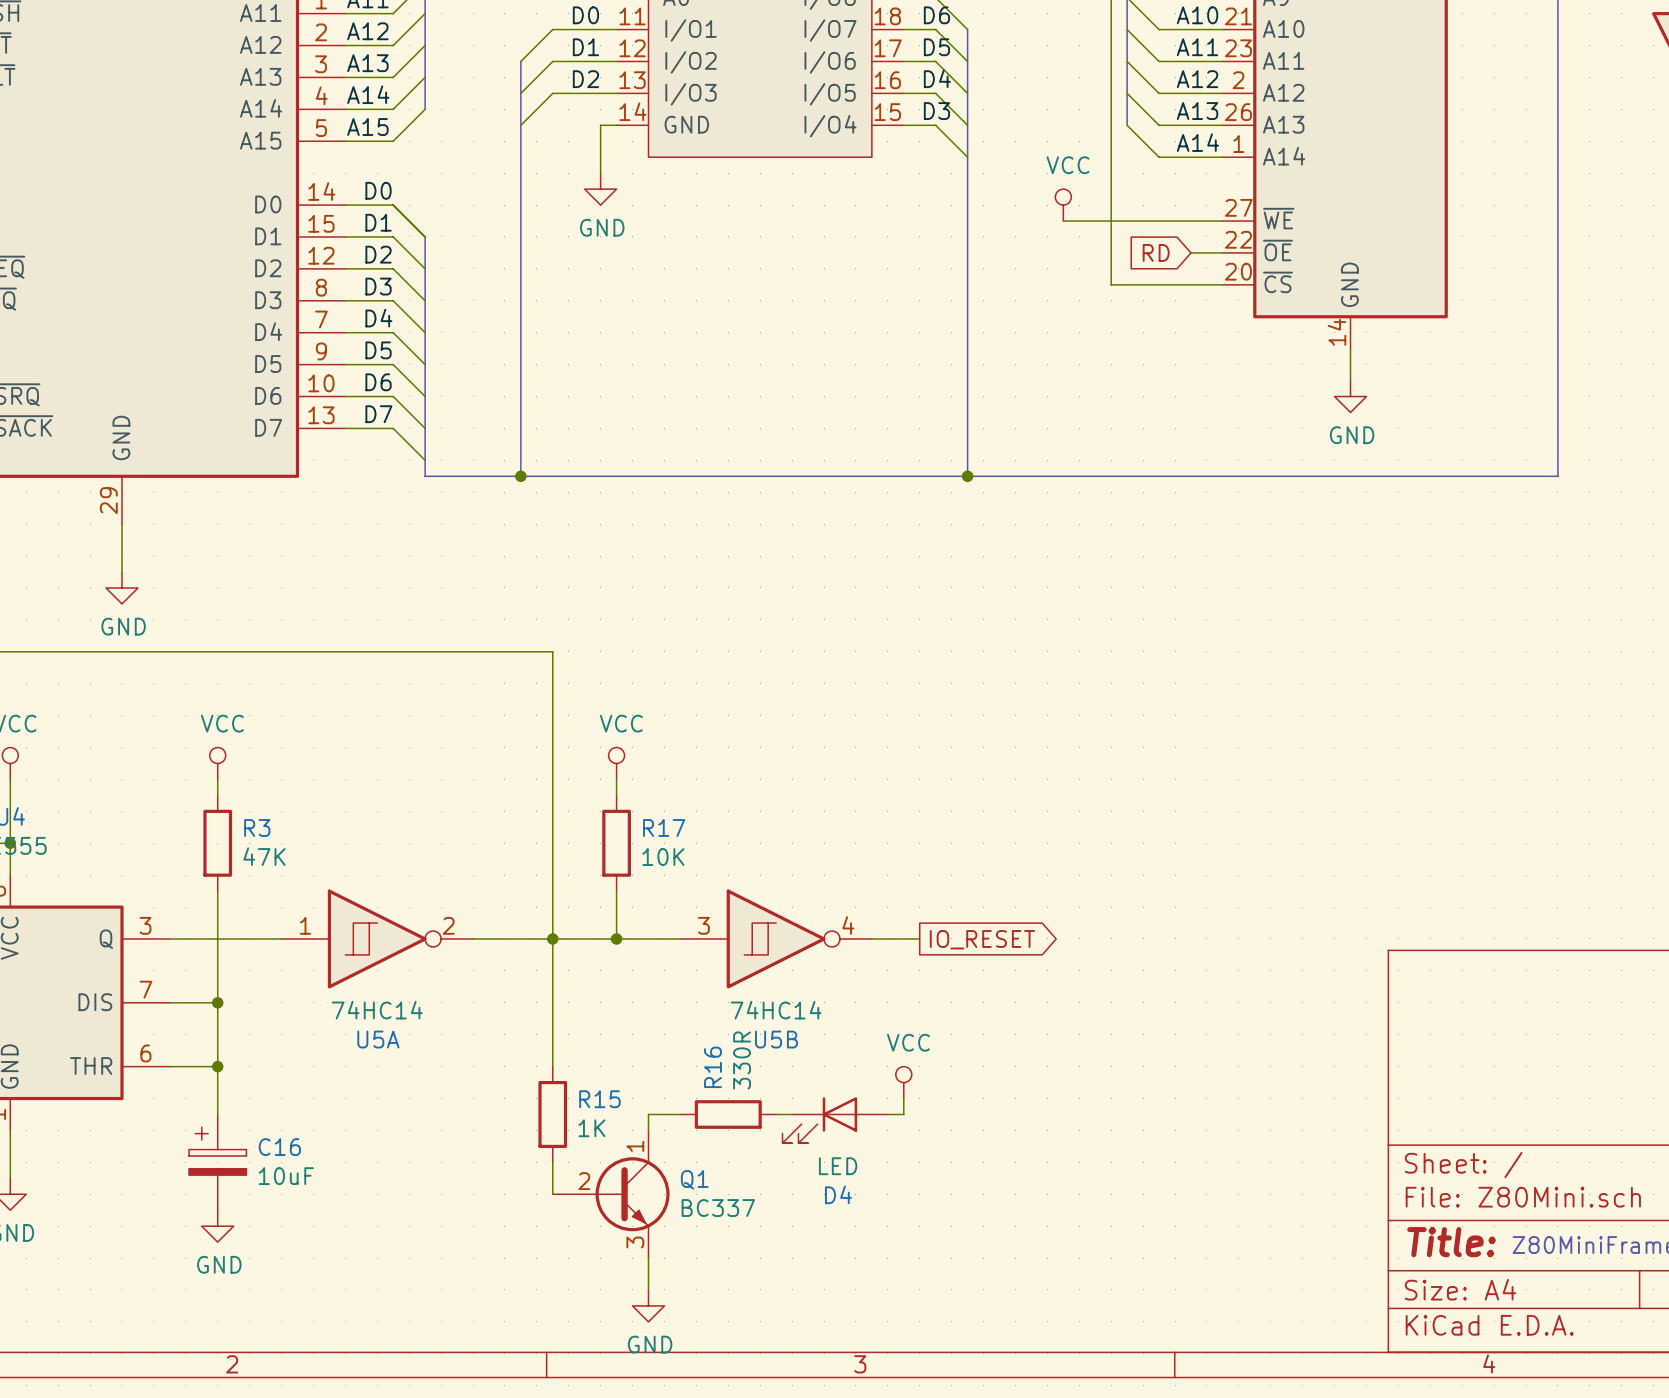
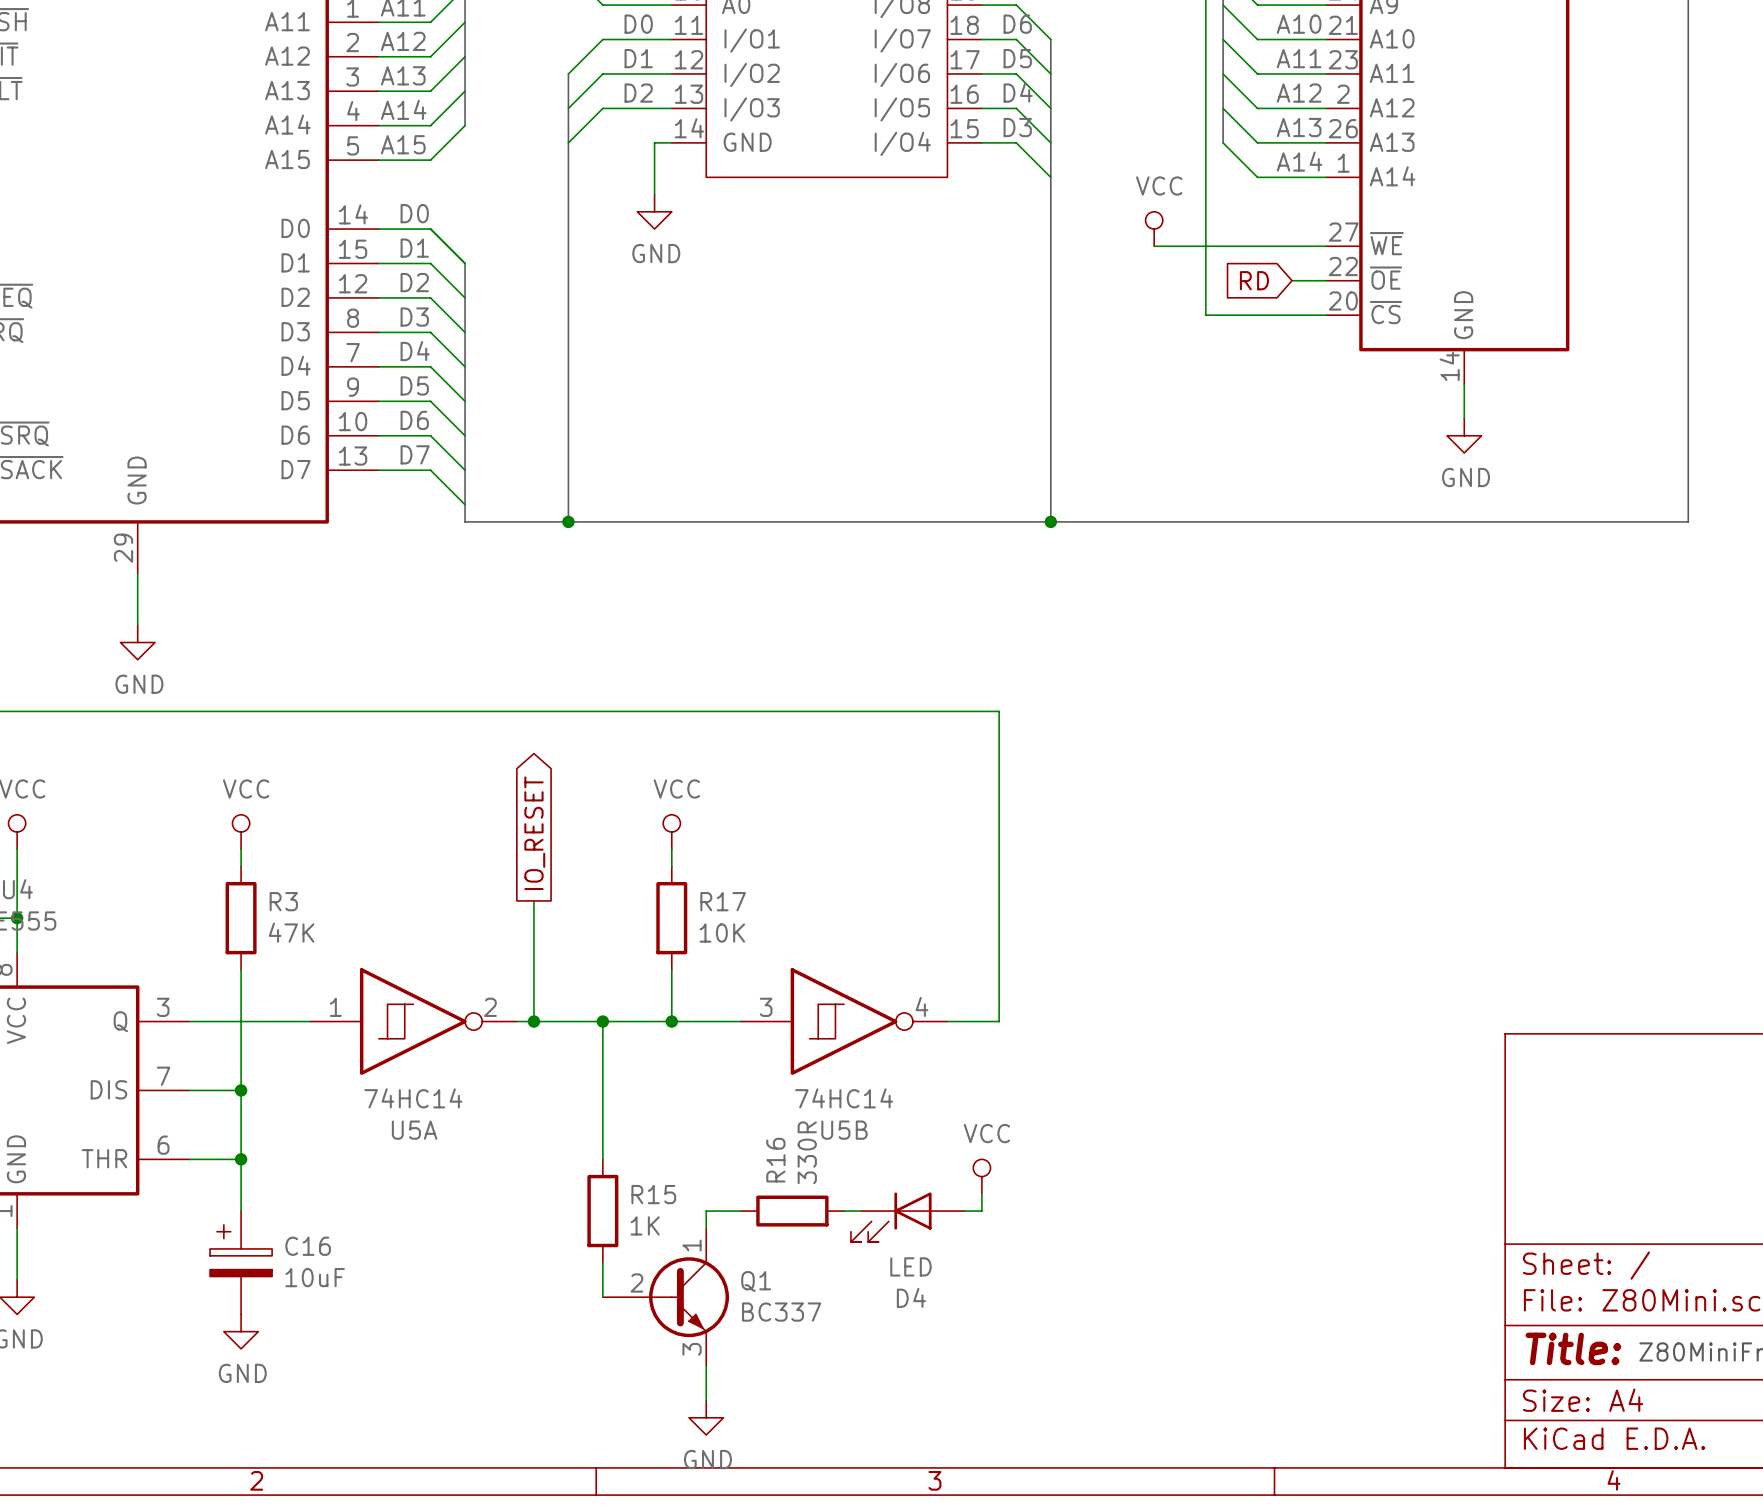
wire: (552, 651) (552, 938) -> (602, 711) (999, 711) (999, 1021)
global label: none -> IO_RESET (534, 833)
wire: none -> (533, 900) (533, 1021)
junction: none -> (533, 1021)
global label: IO_RESET (982, 939) -> none

